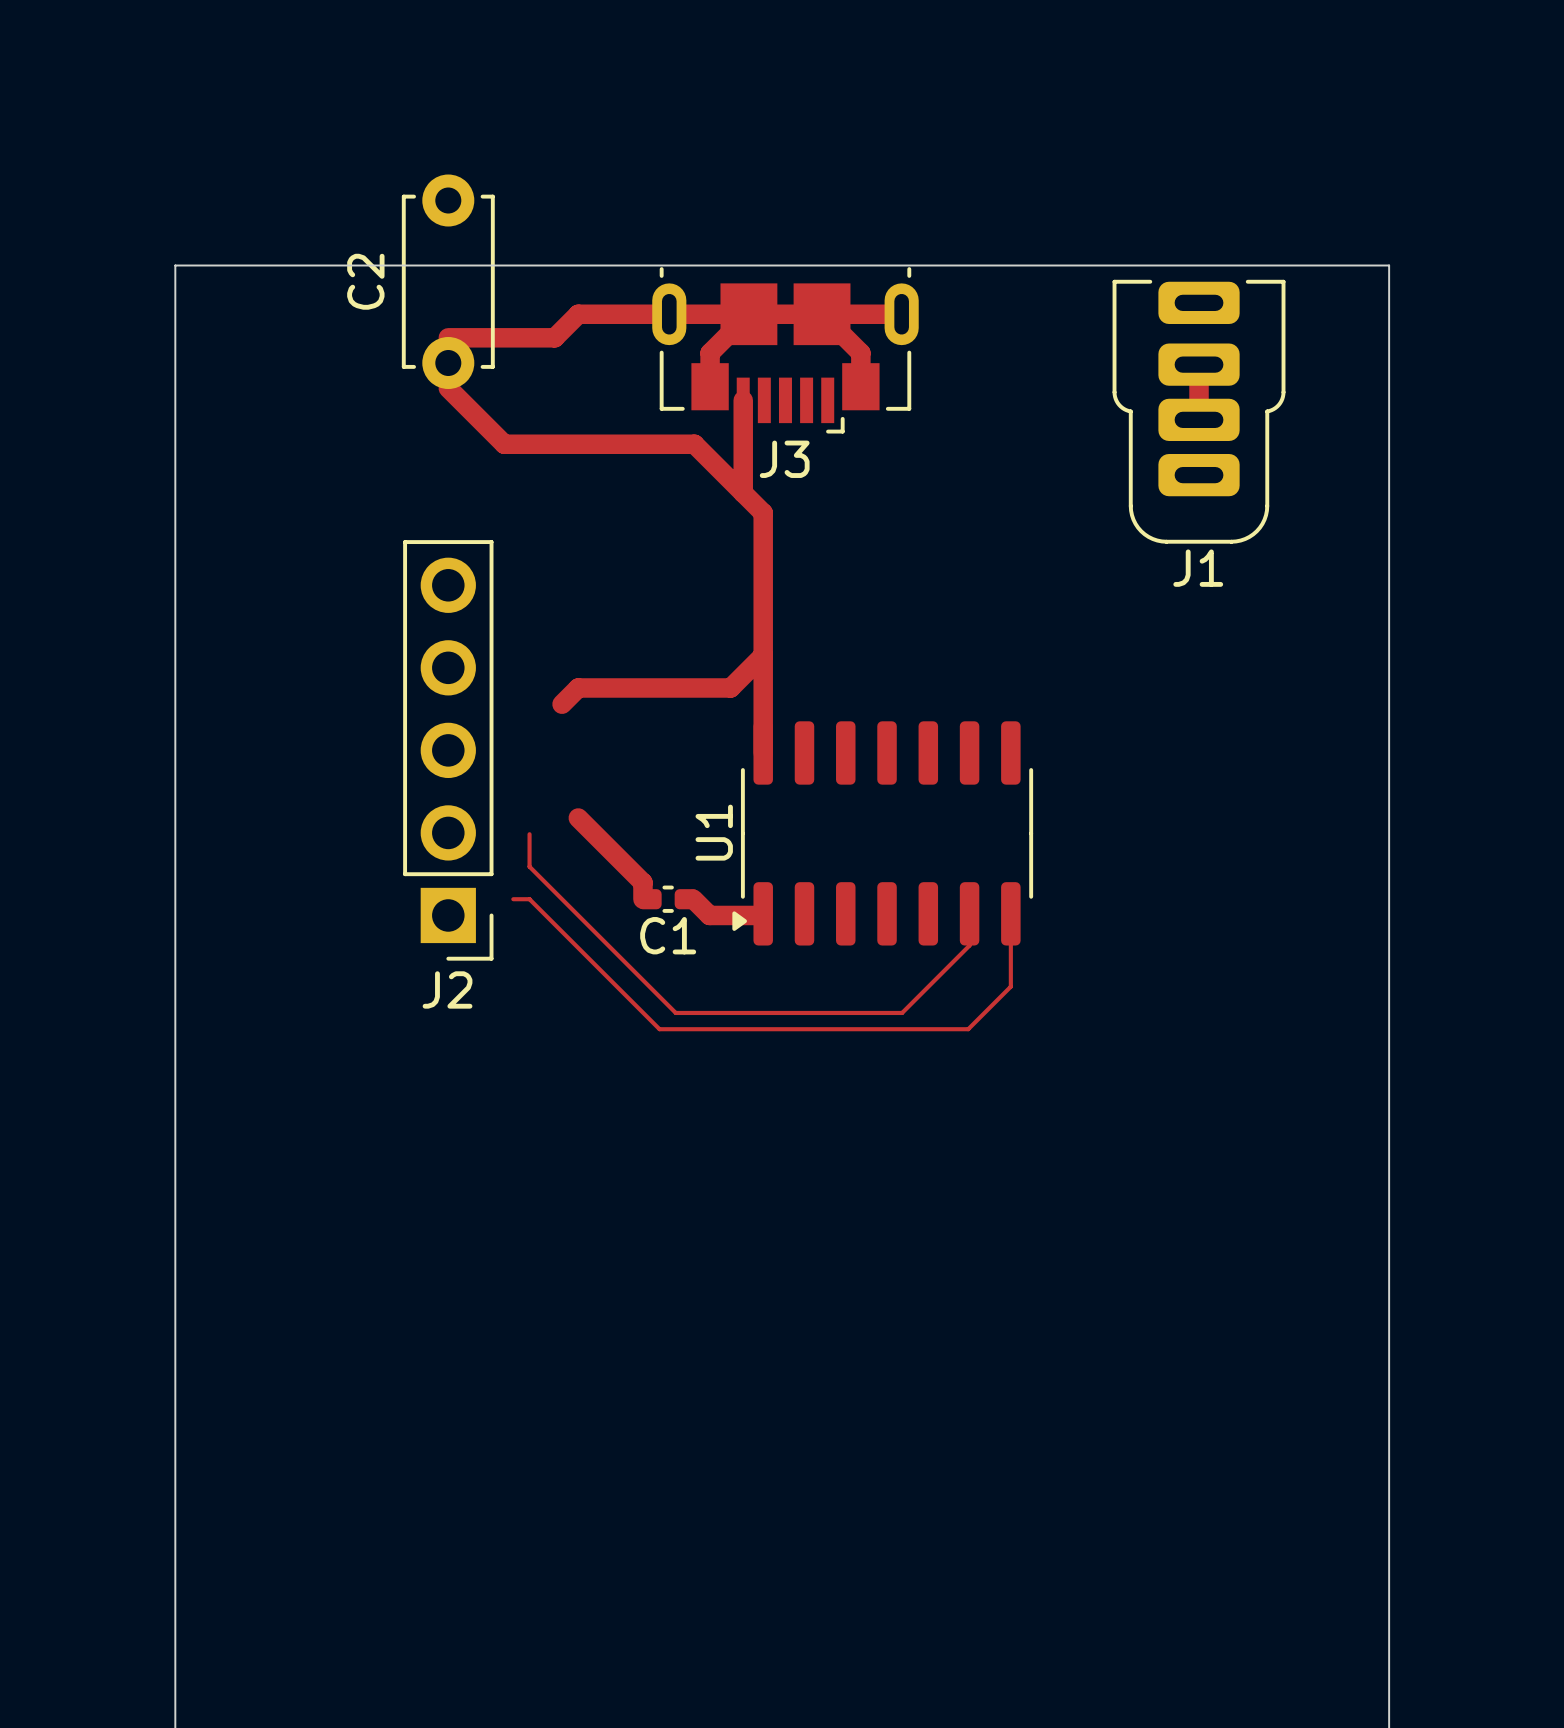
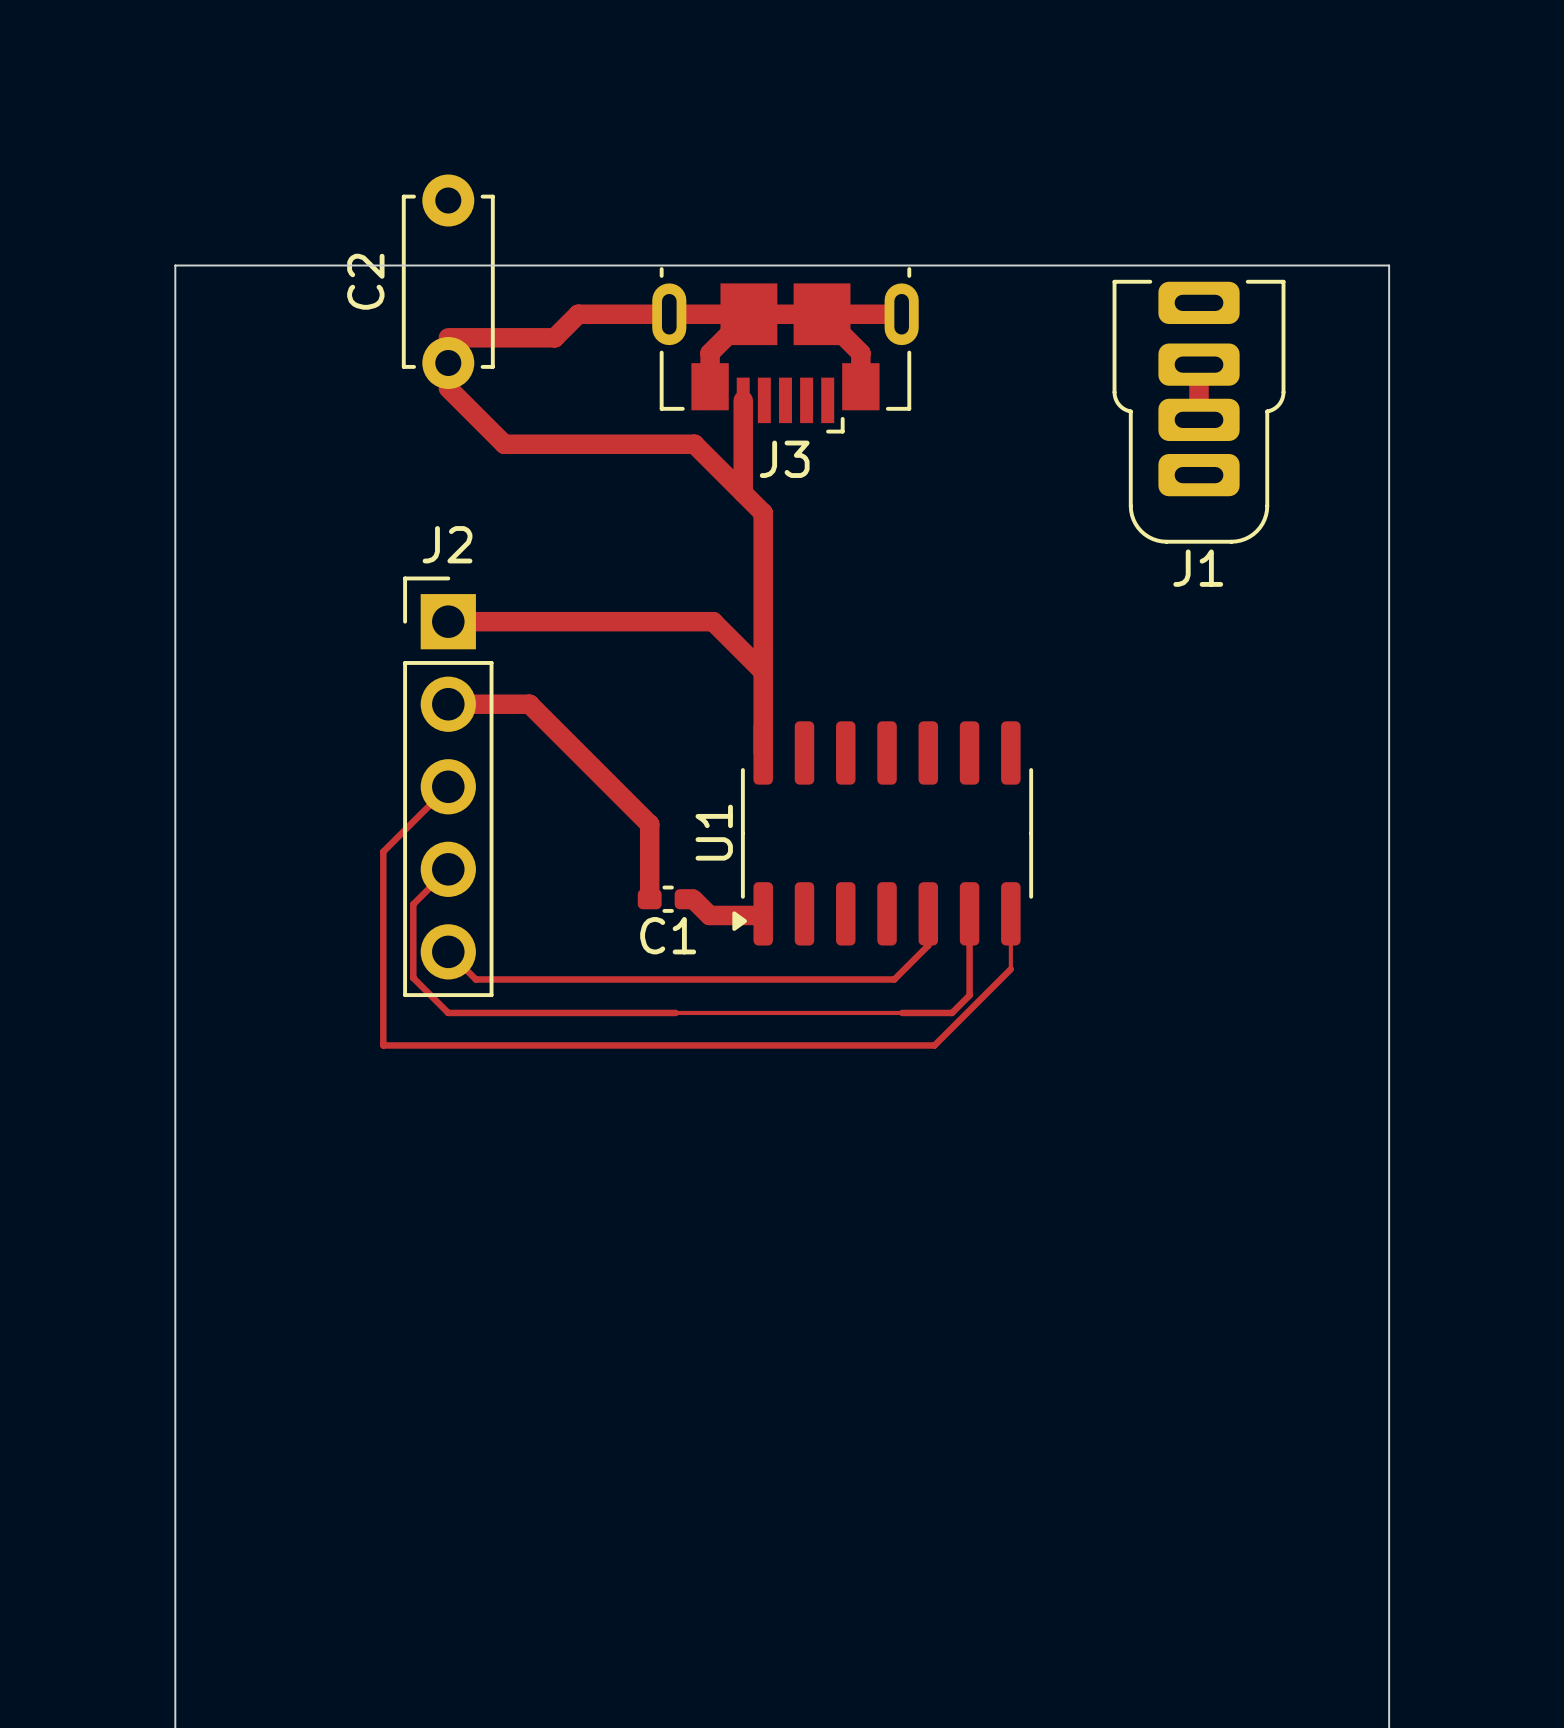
top track: none -> (448, 621) (713, 621) (763, 671)
top track: (763, 655) (730, 687) (578, 687) (562, 704) -> none
top track: none -> (448, 704) (529, 704) (649, 824) (649, 899)
J2 rotation: 0° (448, 750) -> 180° (448, 786)
top track: (578, 817) (642, 882) (642, 899) -> none
top track: (529, 834) (529, 866) (675, 1012) -> (448, 869) (413, 904) (413, 977) (448, 1012) (675, 1012)
top track: (513, 899) (529, 899) (659, 1029) (968, 1029) (1010, 986) (1010, 969) -> (448, 786) (383, 851) (383, 1045) (934, 1045) (1010, 969)
top track: none -> (928, 913) (928, 945) (894, 979) (475, 979) (448, 951)
top track: (969, 945) (902, 1012) -> (969, 945) (969, 995) (952, 1012) (902, 1012)

